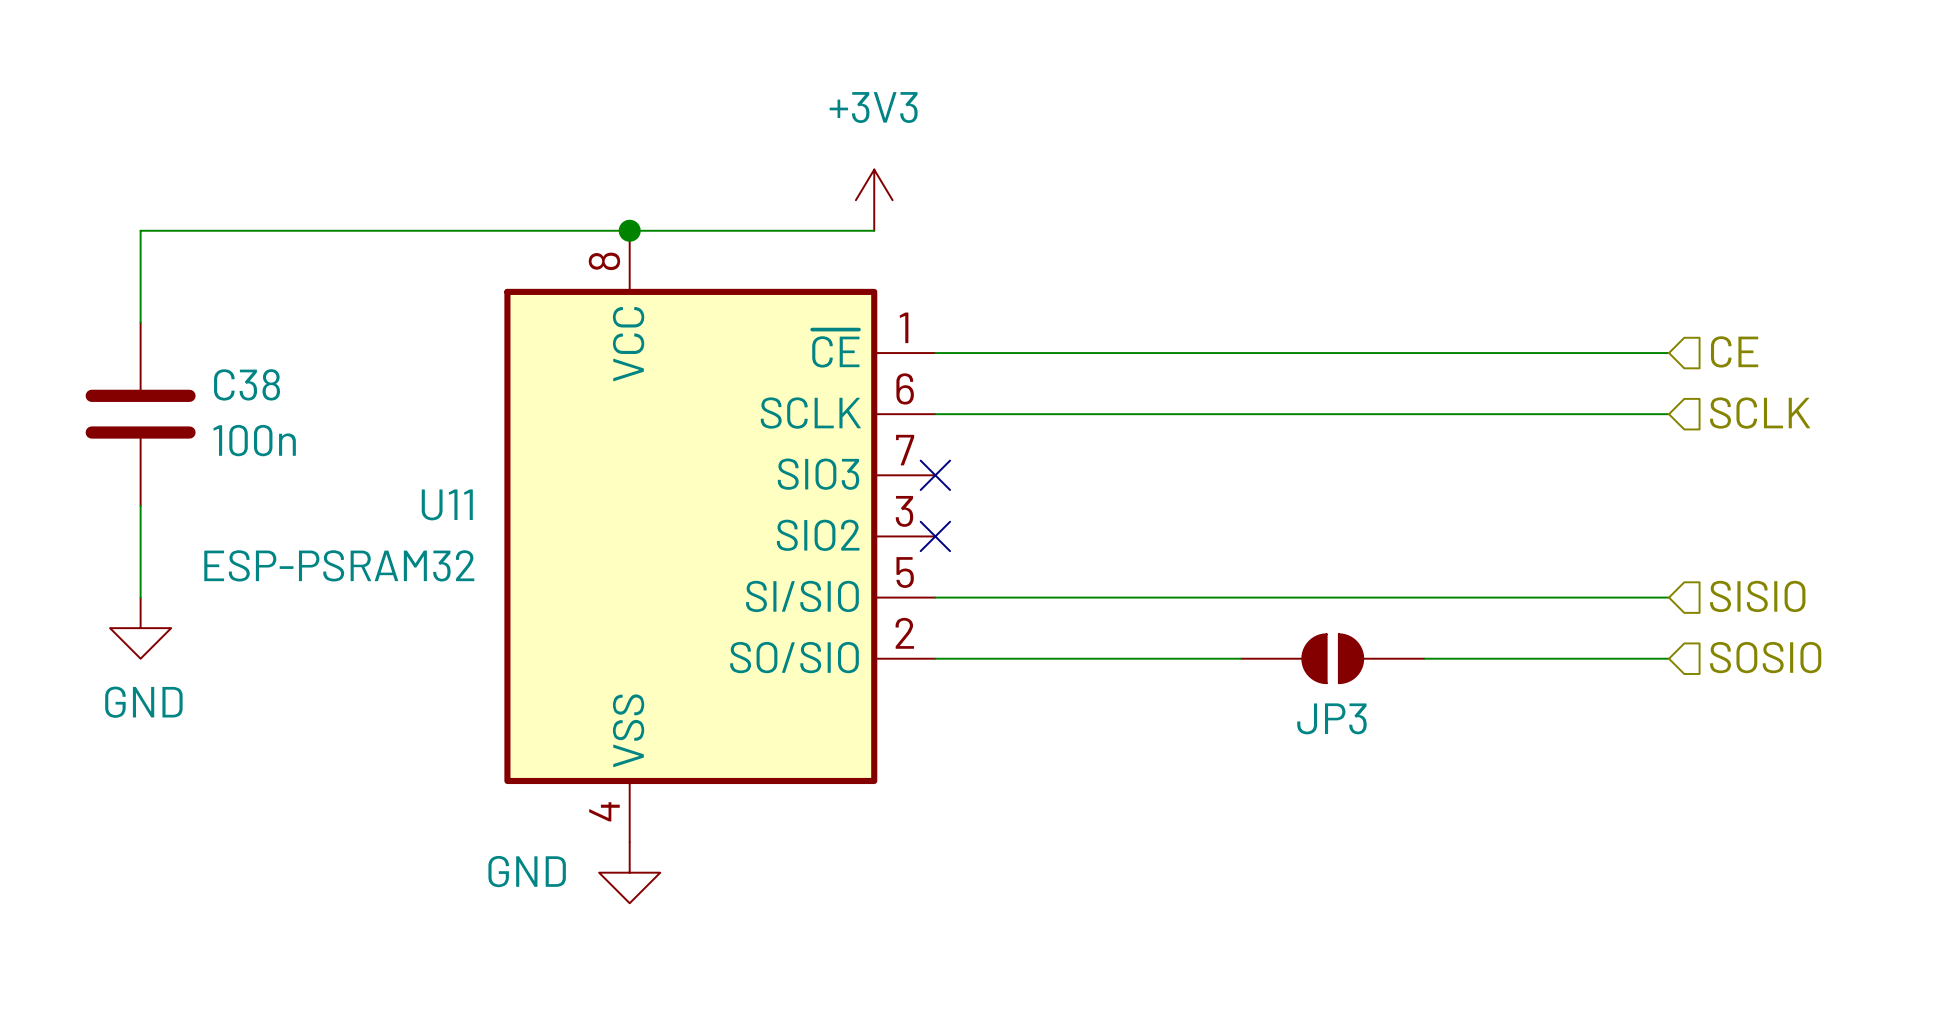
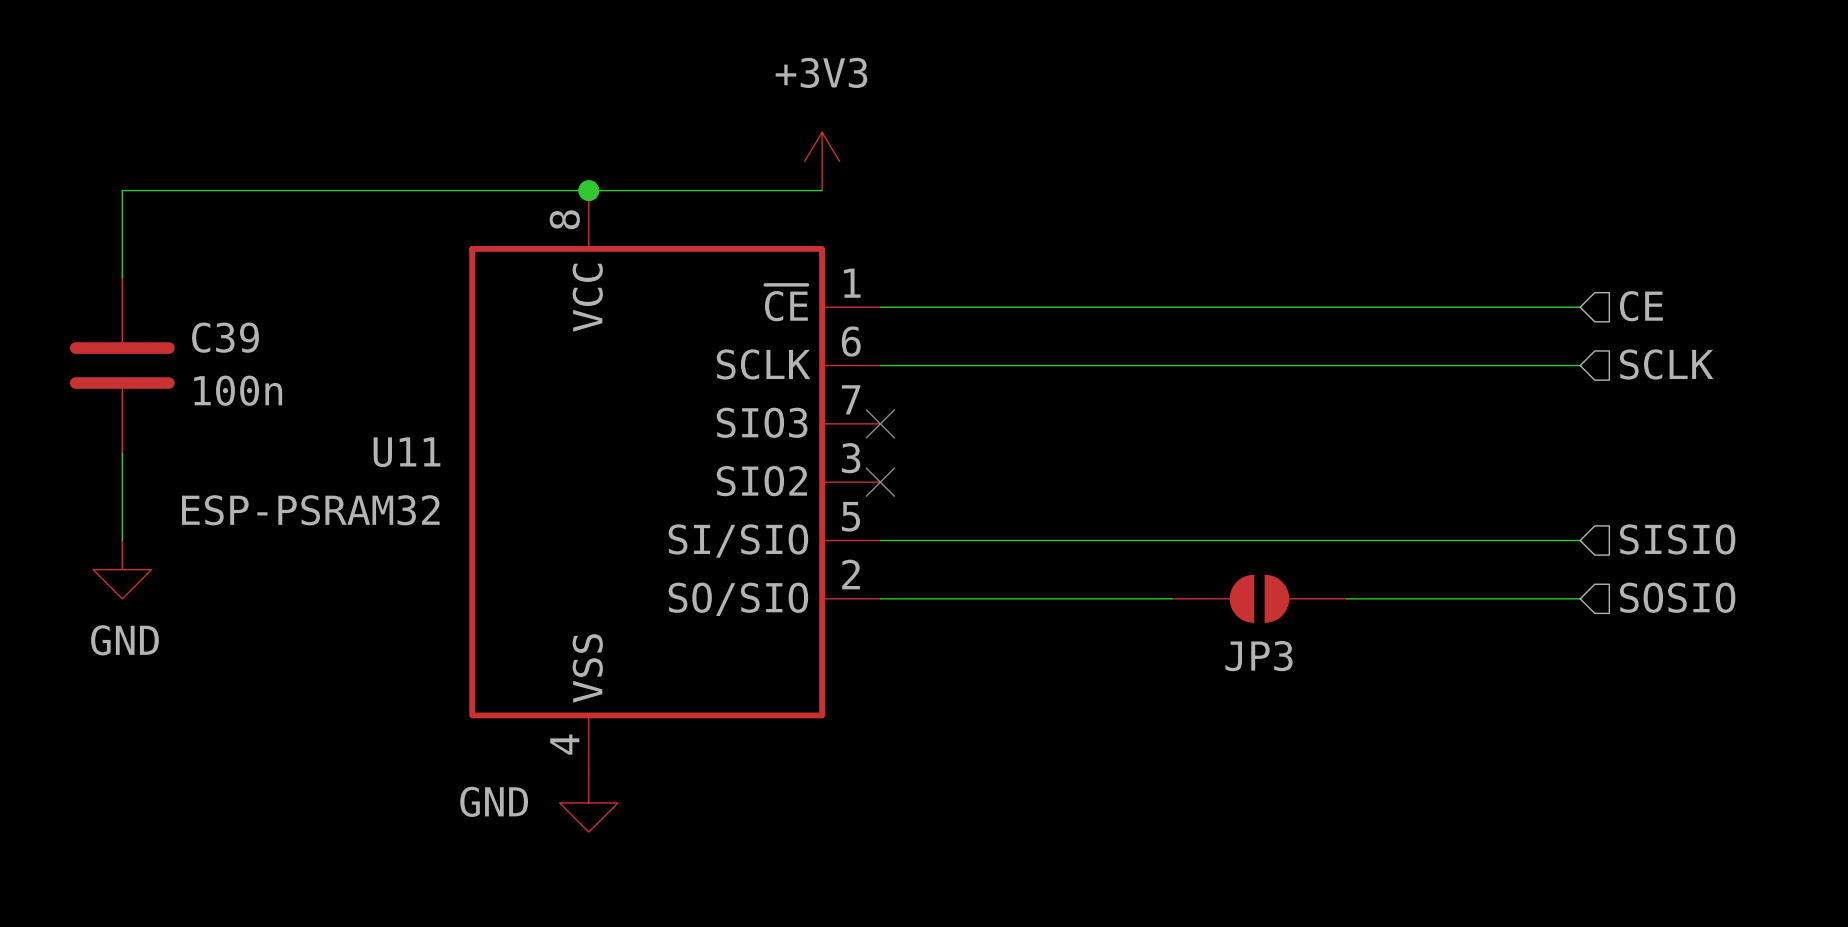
C38 name: C38 (247, 384) -> C39 (225, 337)

